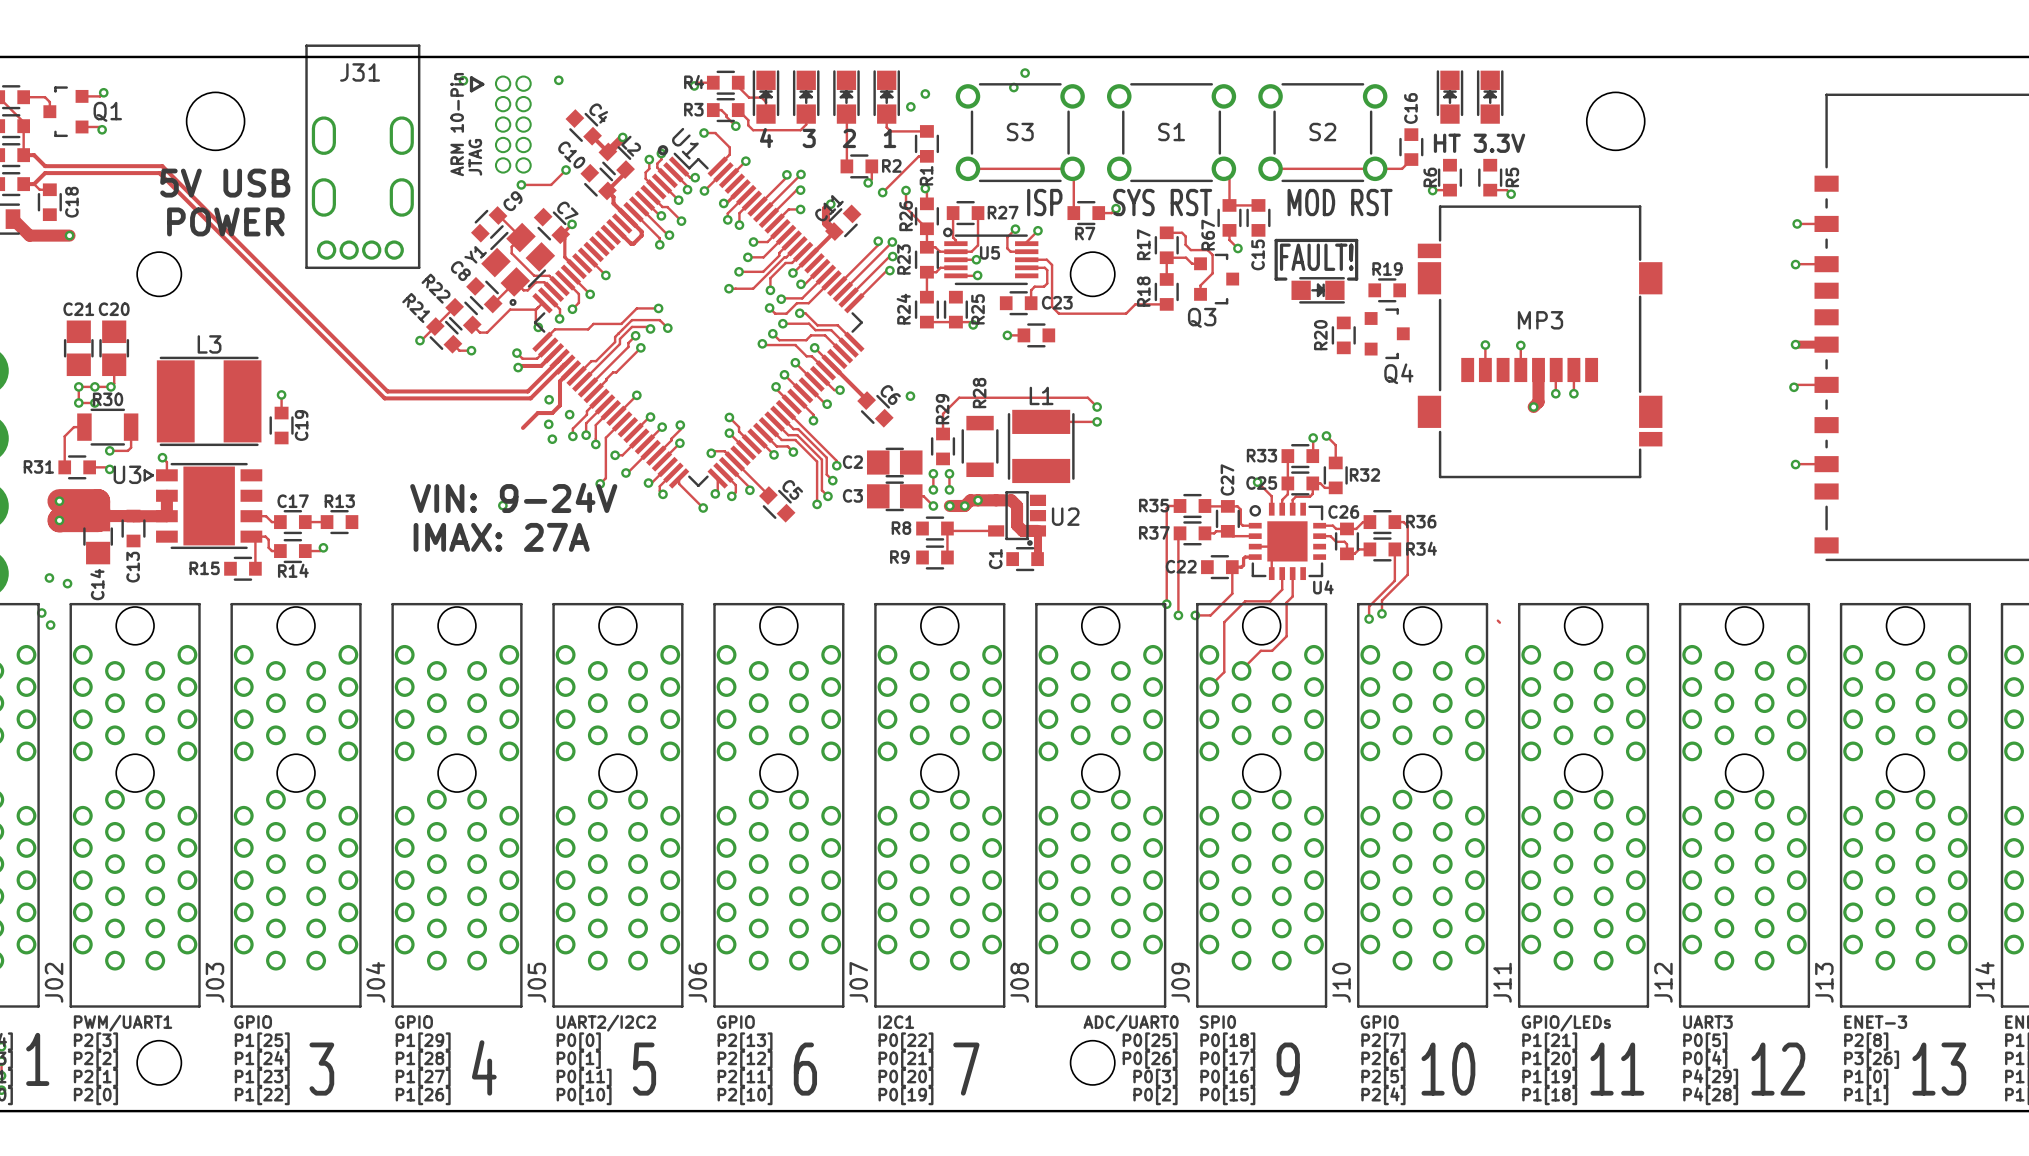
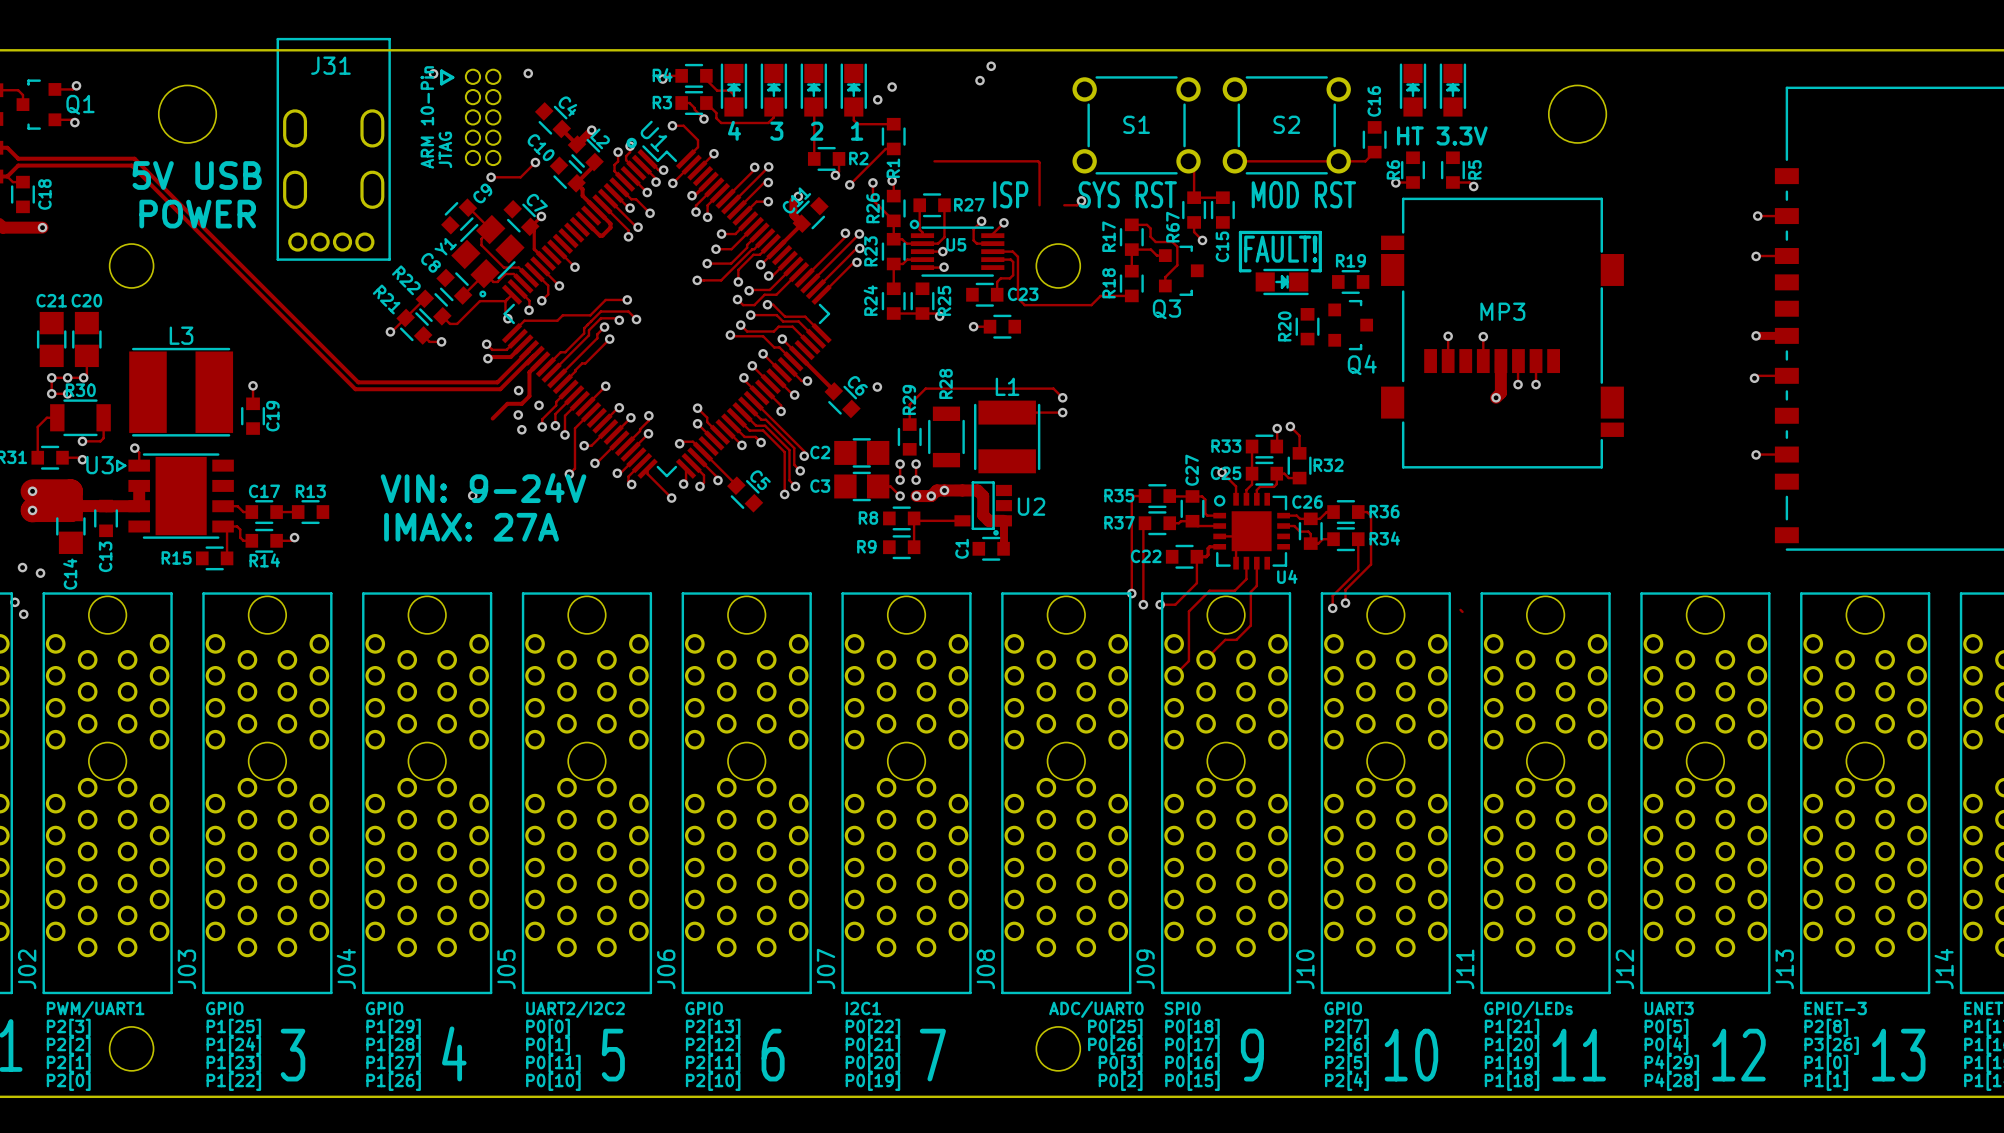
S3: (1020, 132) -> none
R7: (1086, 213) -> none

